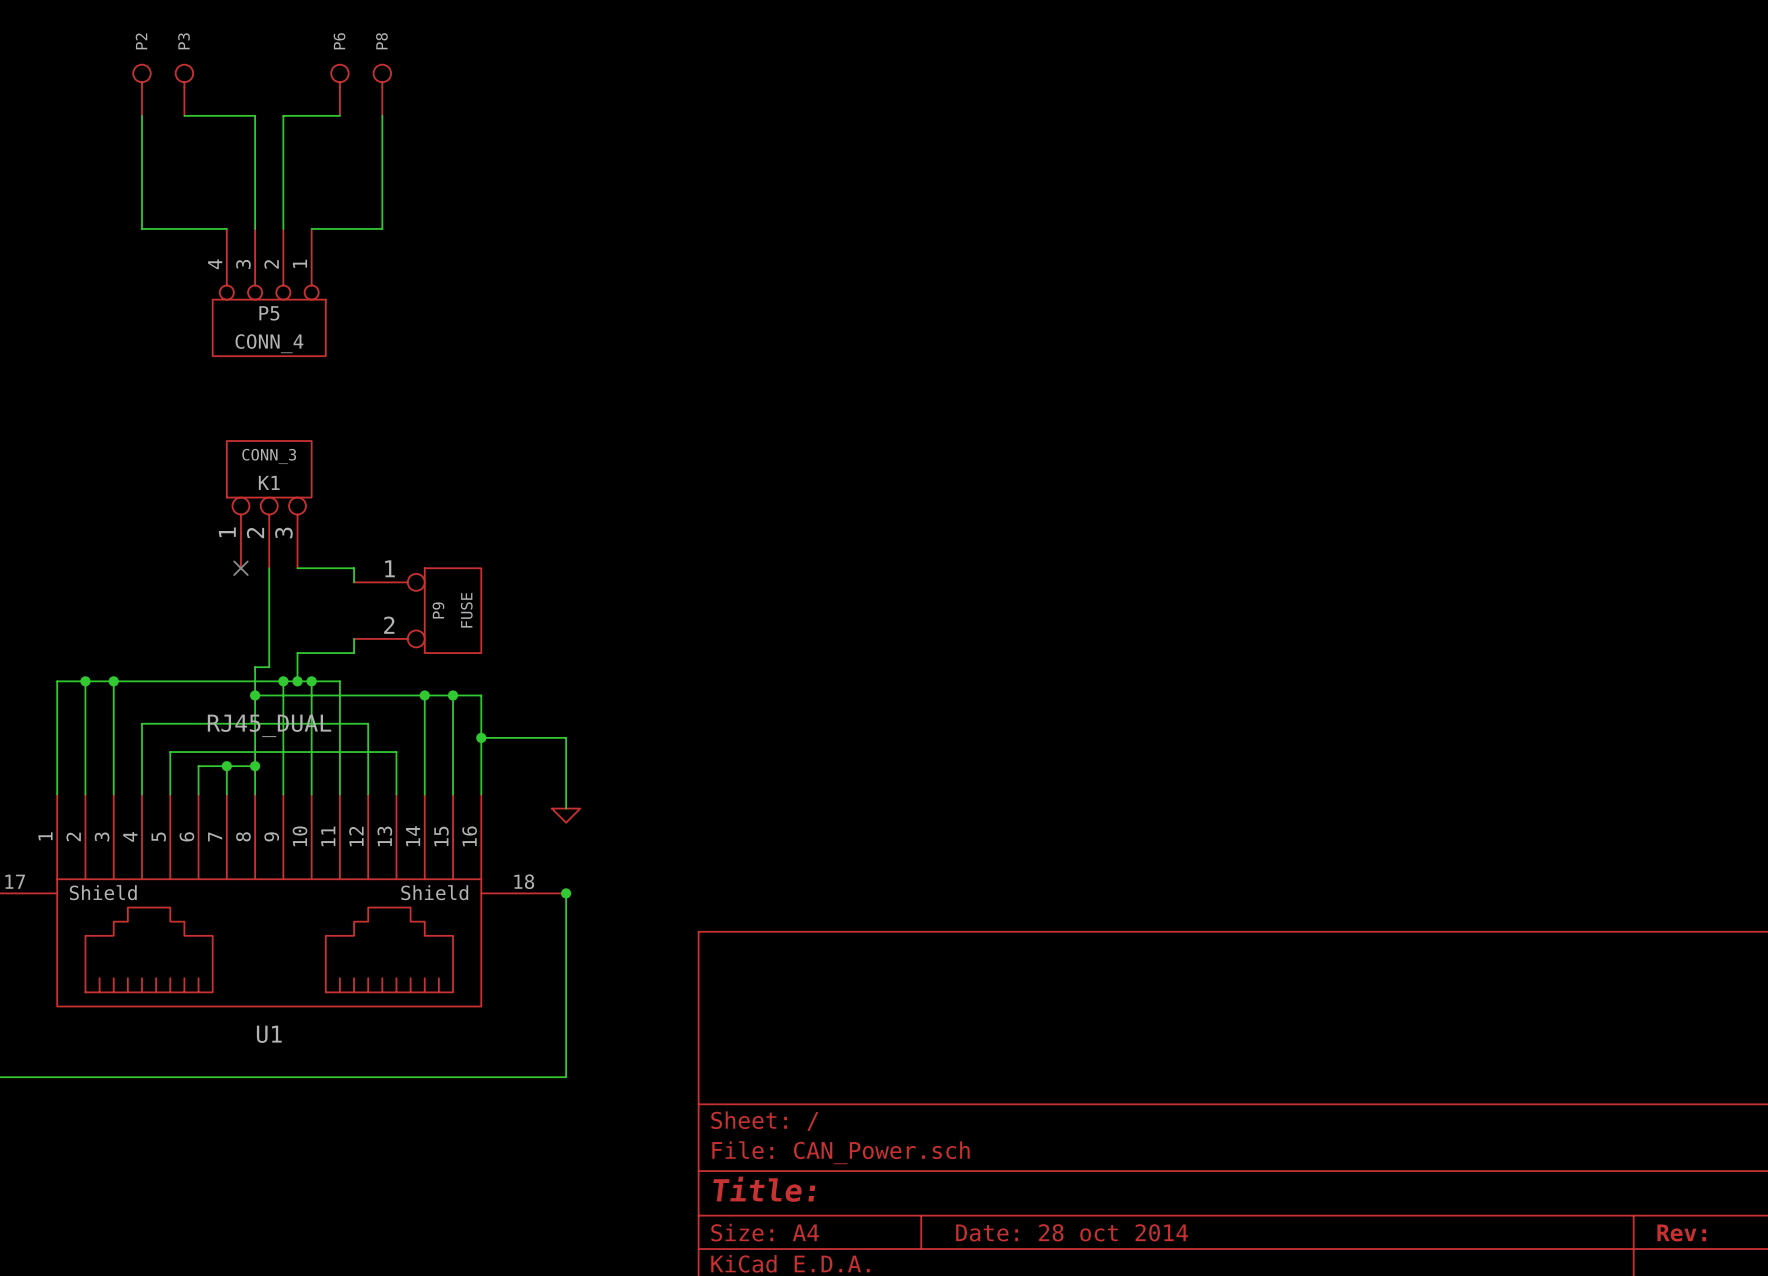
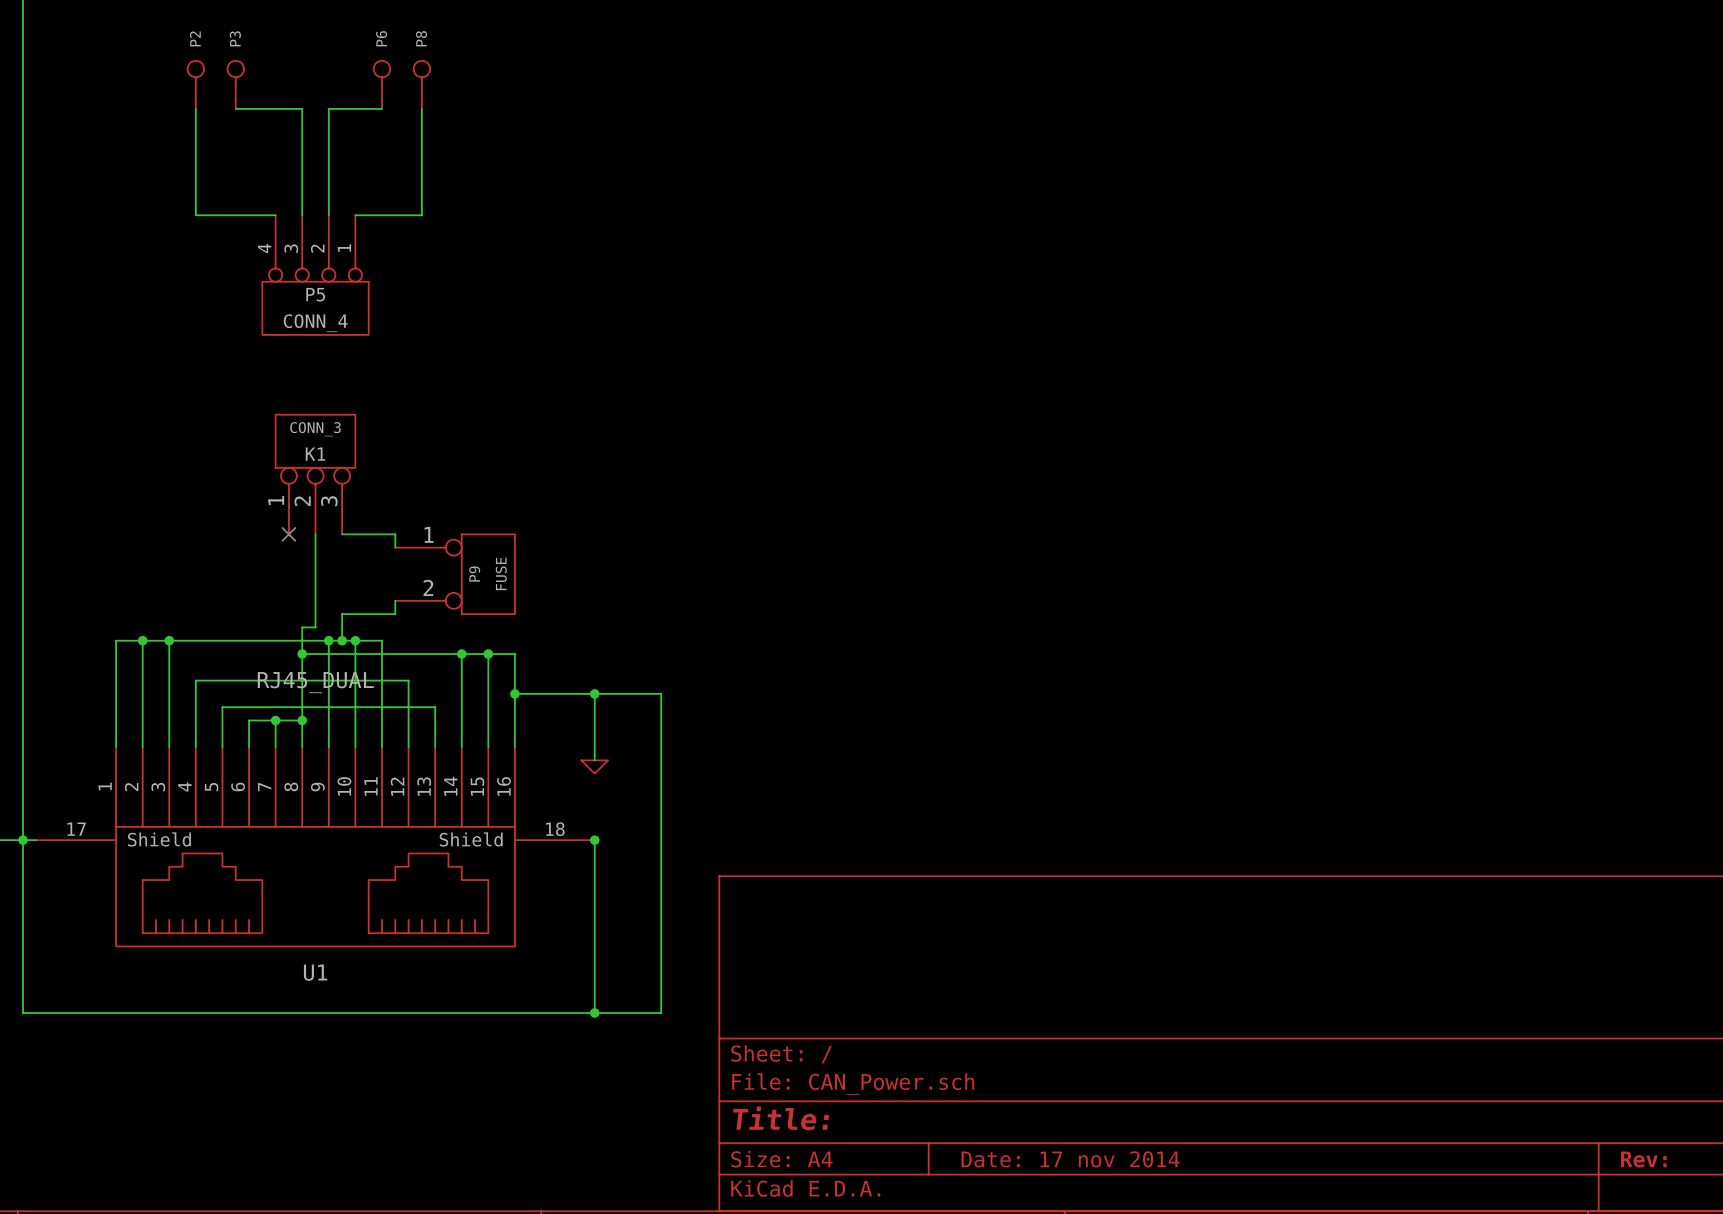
wire: none -> (594, 693) (661, 693) (661, 1012) (594, 1012)
junction: none -> (594, 693)
junction: none -> (594, 1012)
title block: Date: 28 oct 2014 (1072, 1232) -> Date: 17 nov 2014 (1070, 1159)

